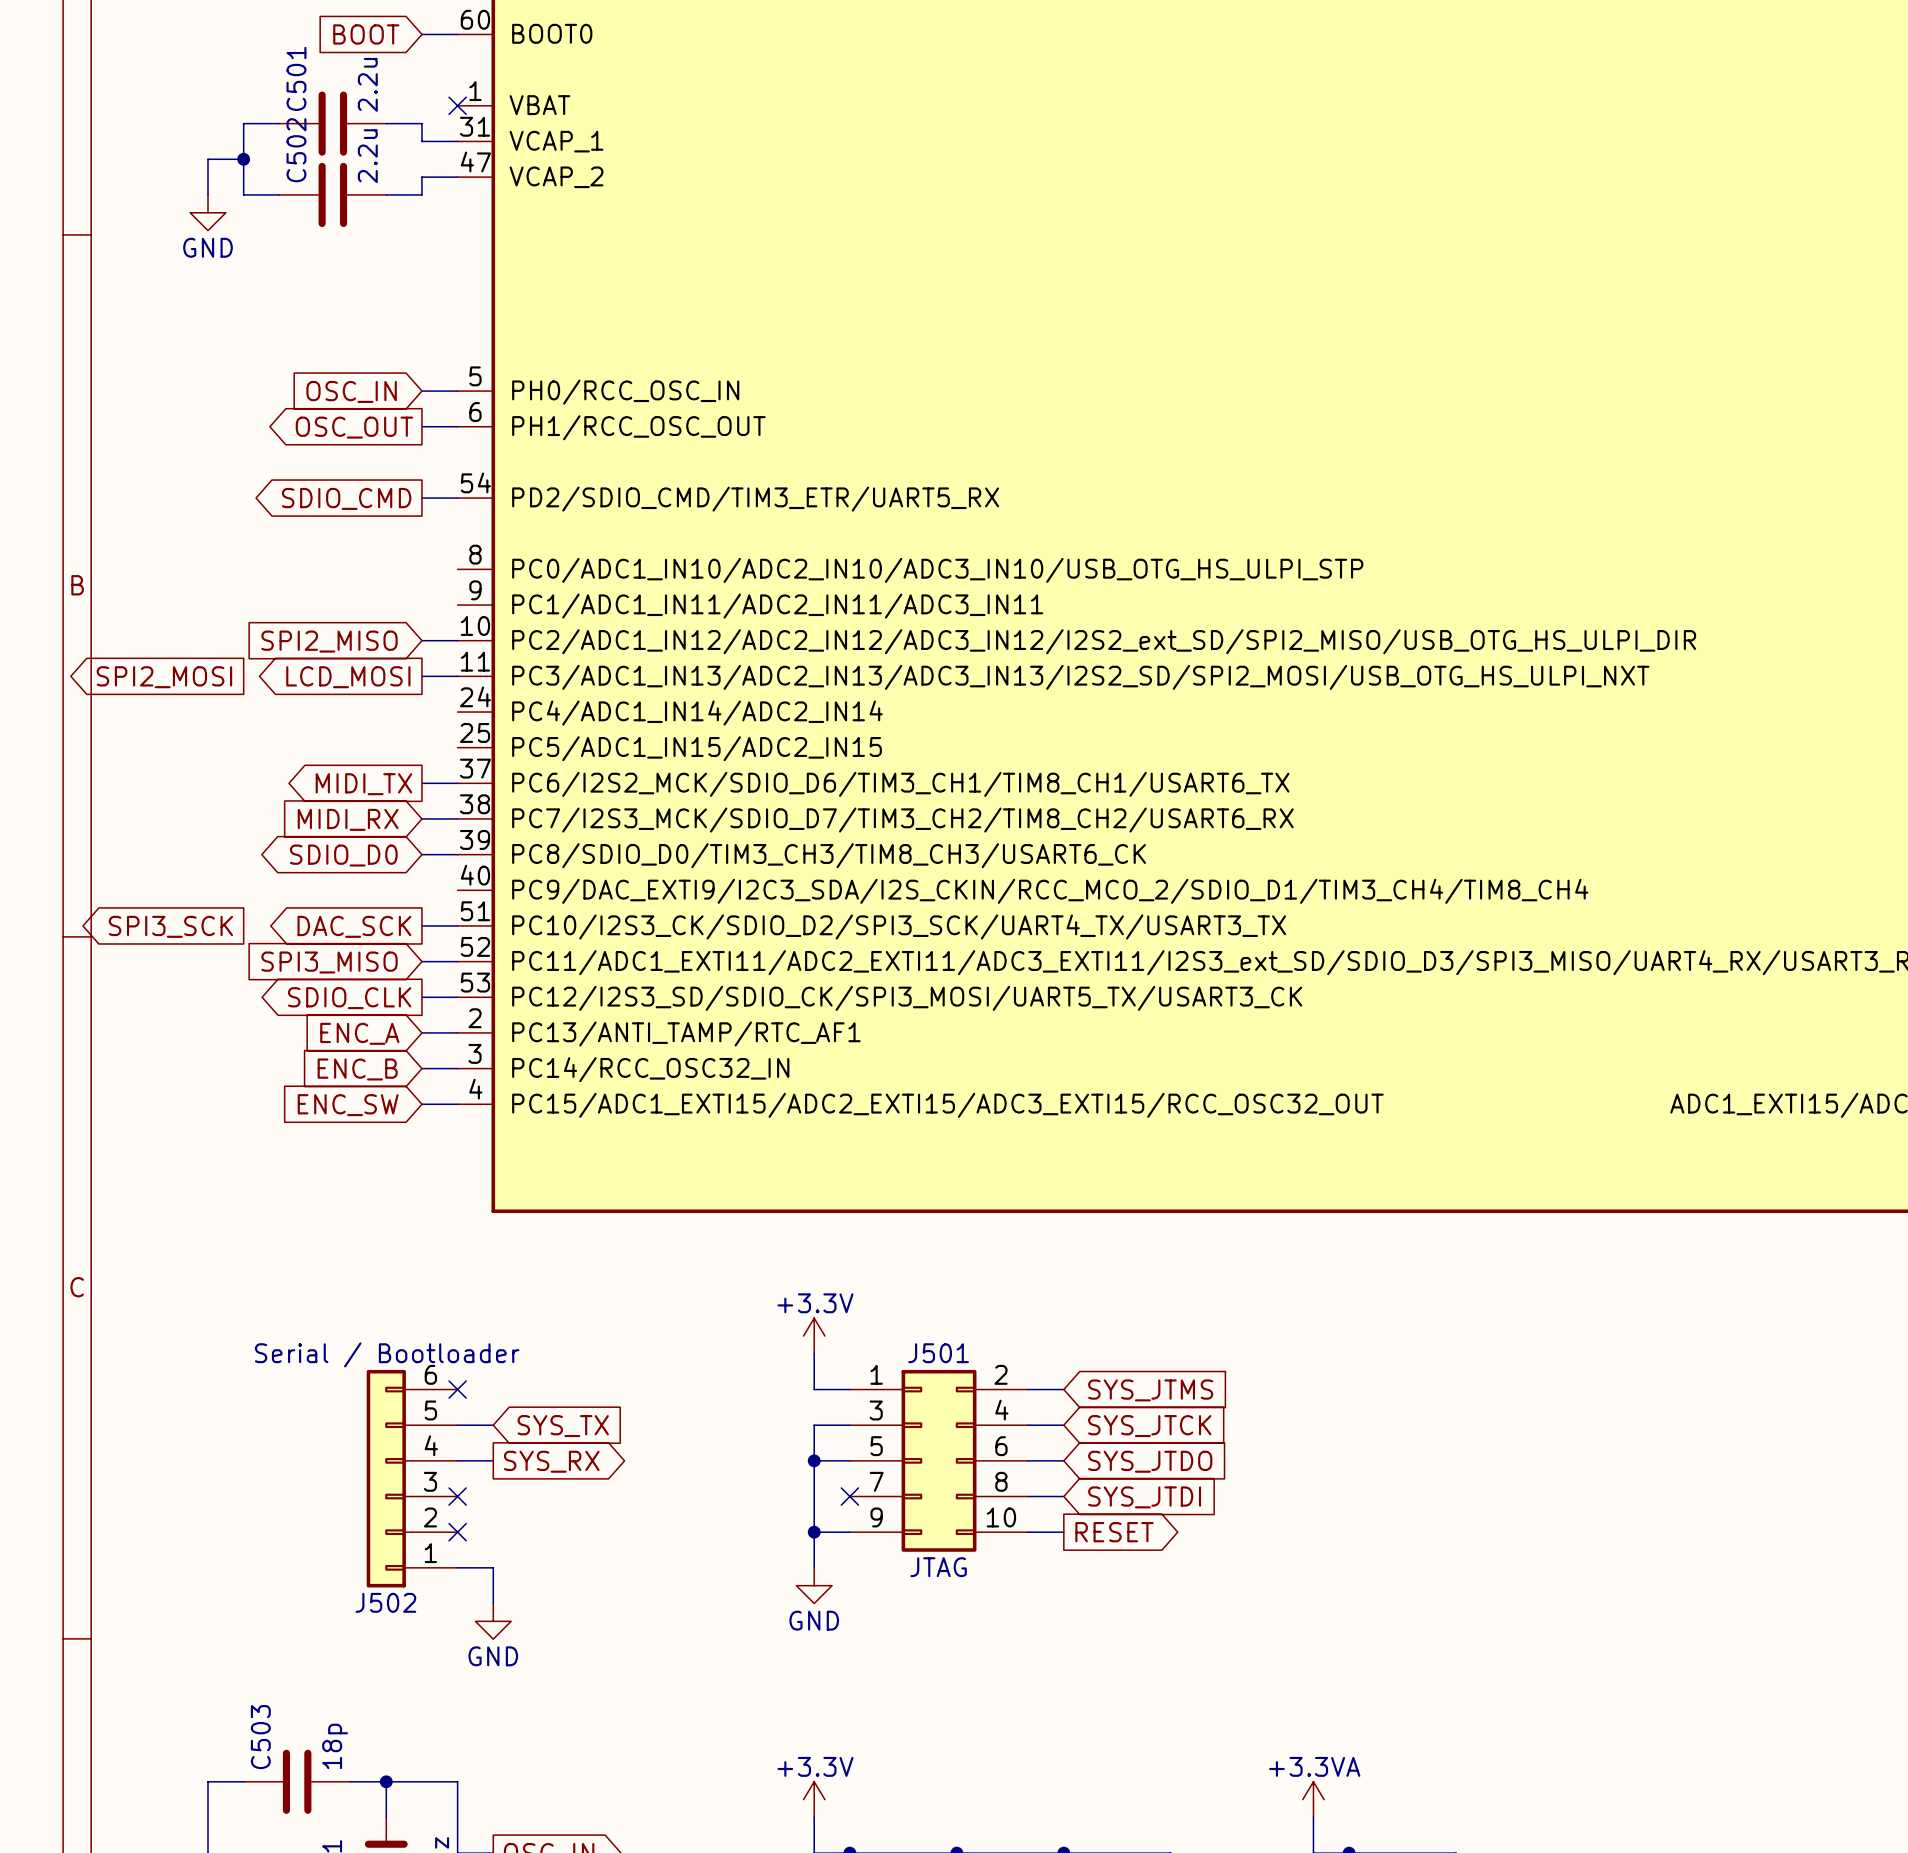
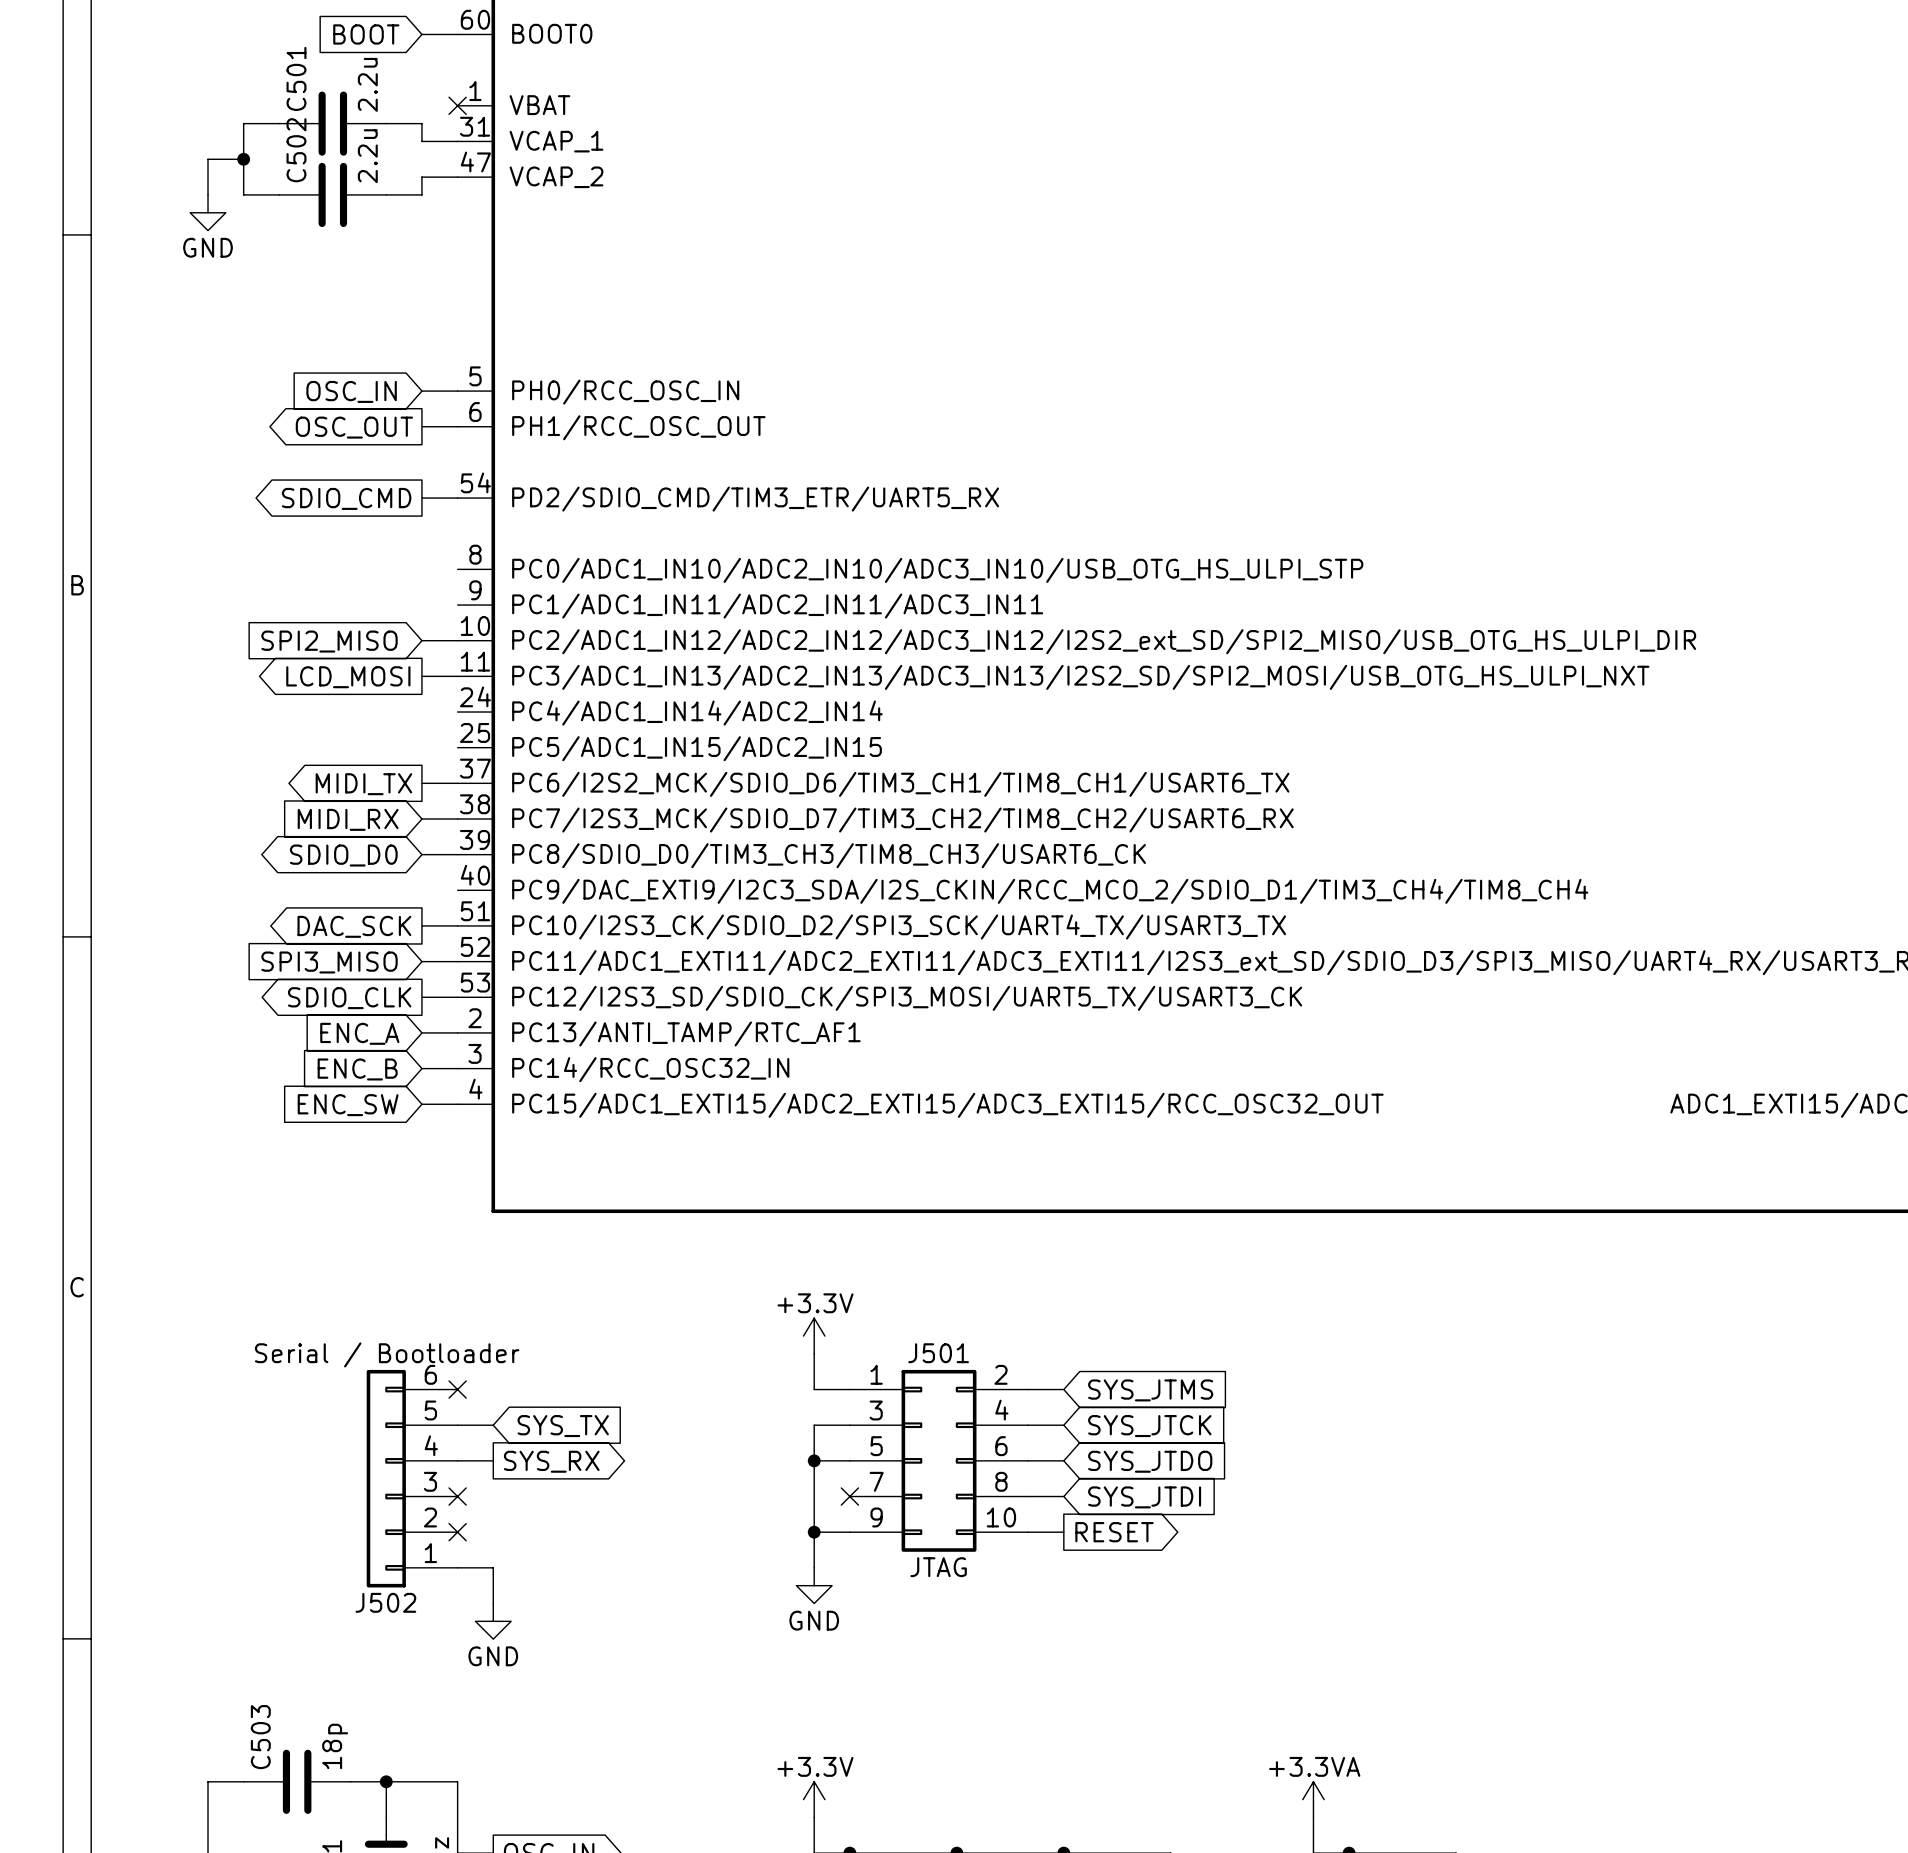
global label: SPI2_MOSI (164, 677) -> none
global label: SPI3_SCK (170, 926) -> none

